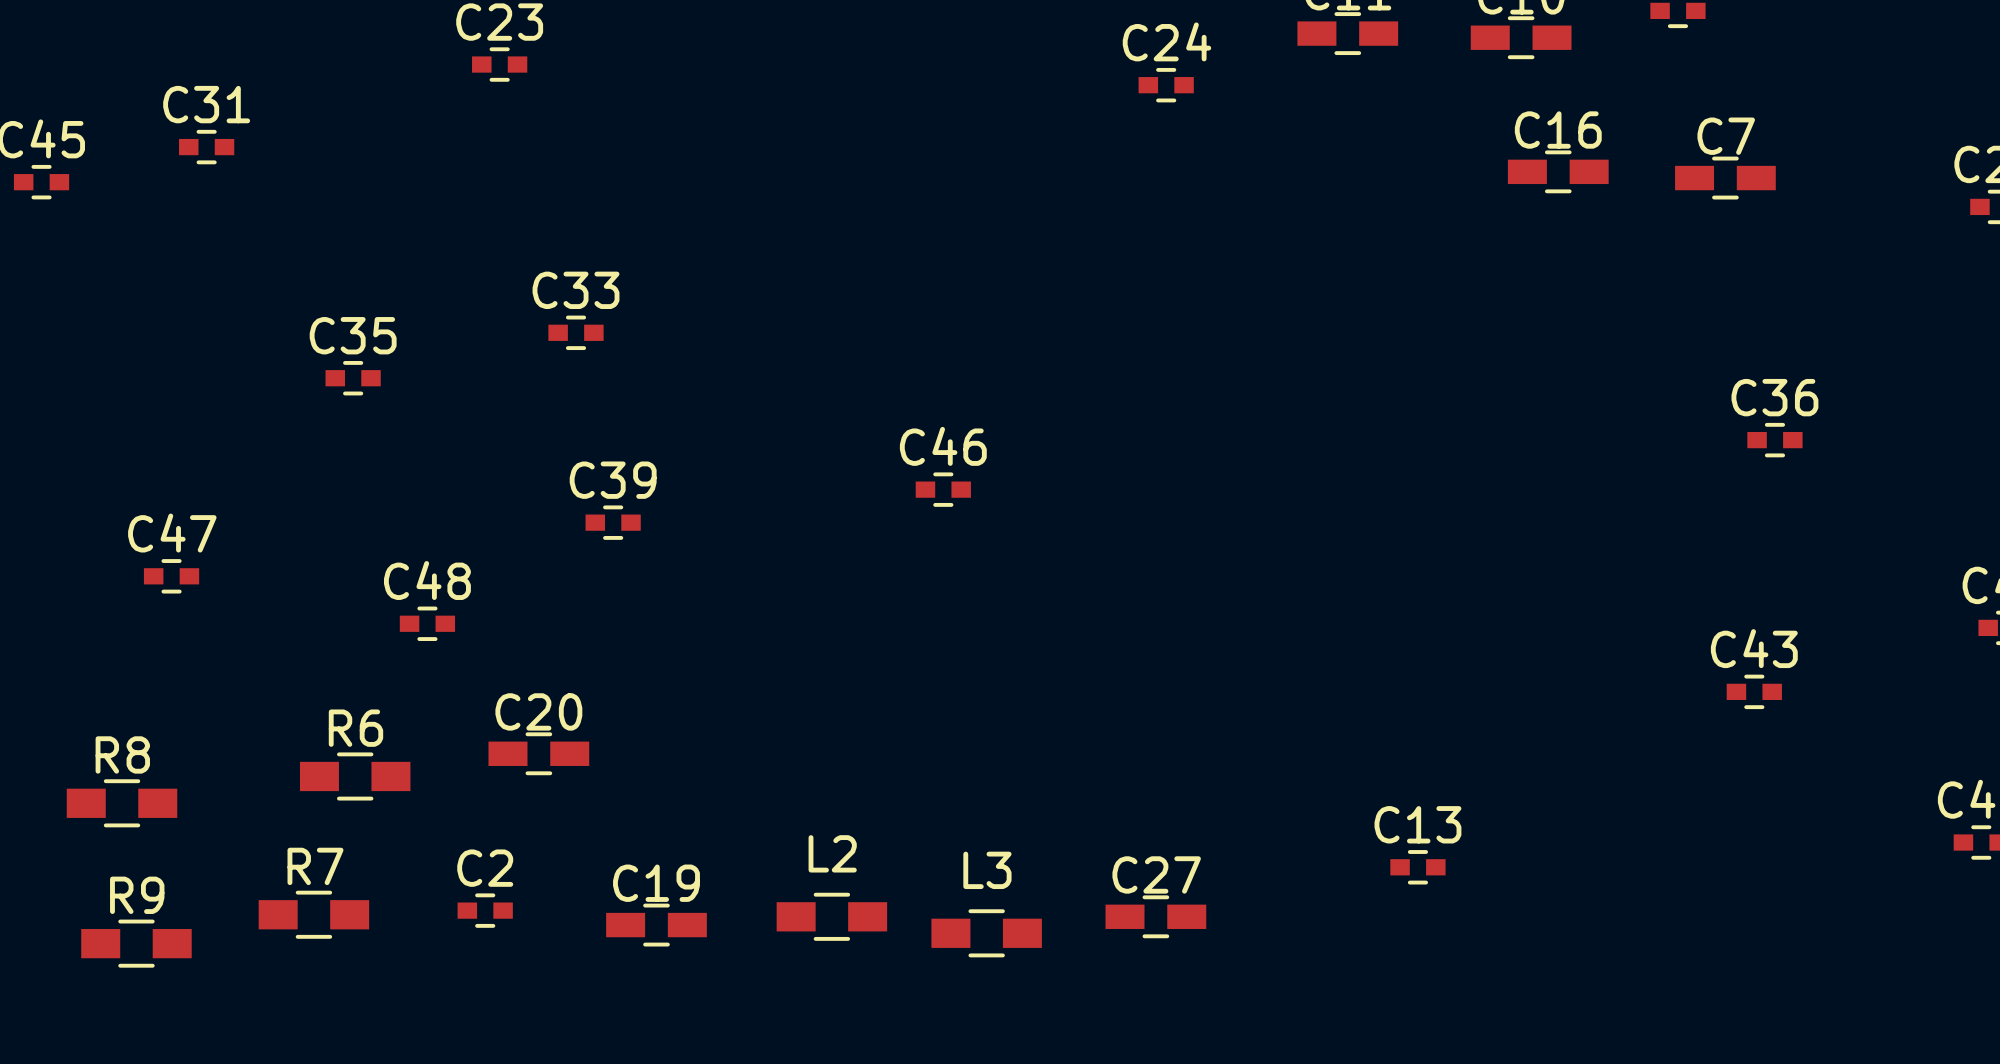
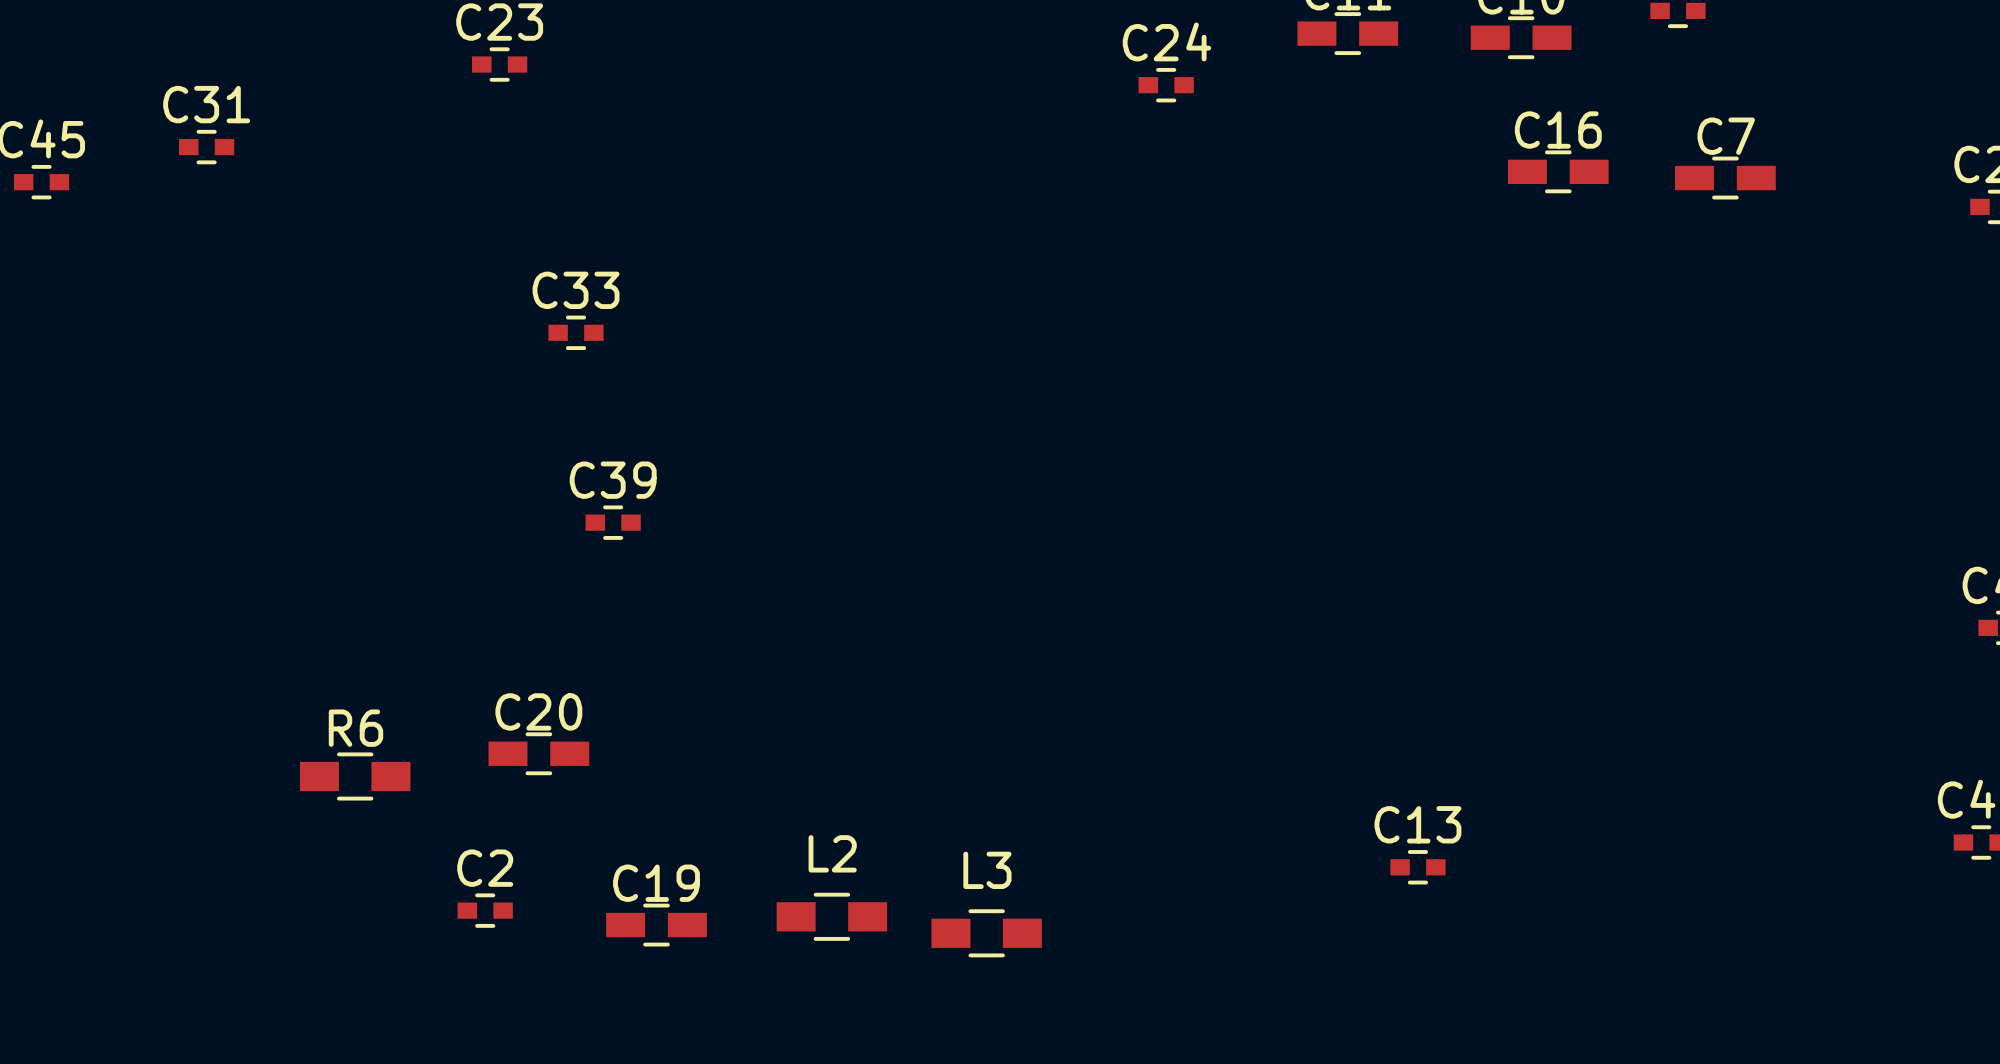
C35: (353, 378) -> none
C36: (1774, 440) -> none
C46: (943, 489) -> none
C47: (171, 576) -> none
C48: (427, 623) -> none
C43: (1754, 691) -> none
R8: (122, 803) -> none
R7: (313, 914) -> none
C27: (1155, 916) -> none
R9: (136, 943) -> none

